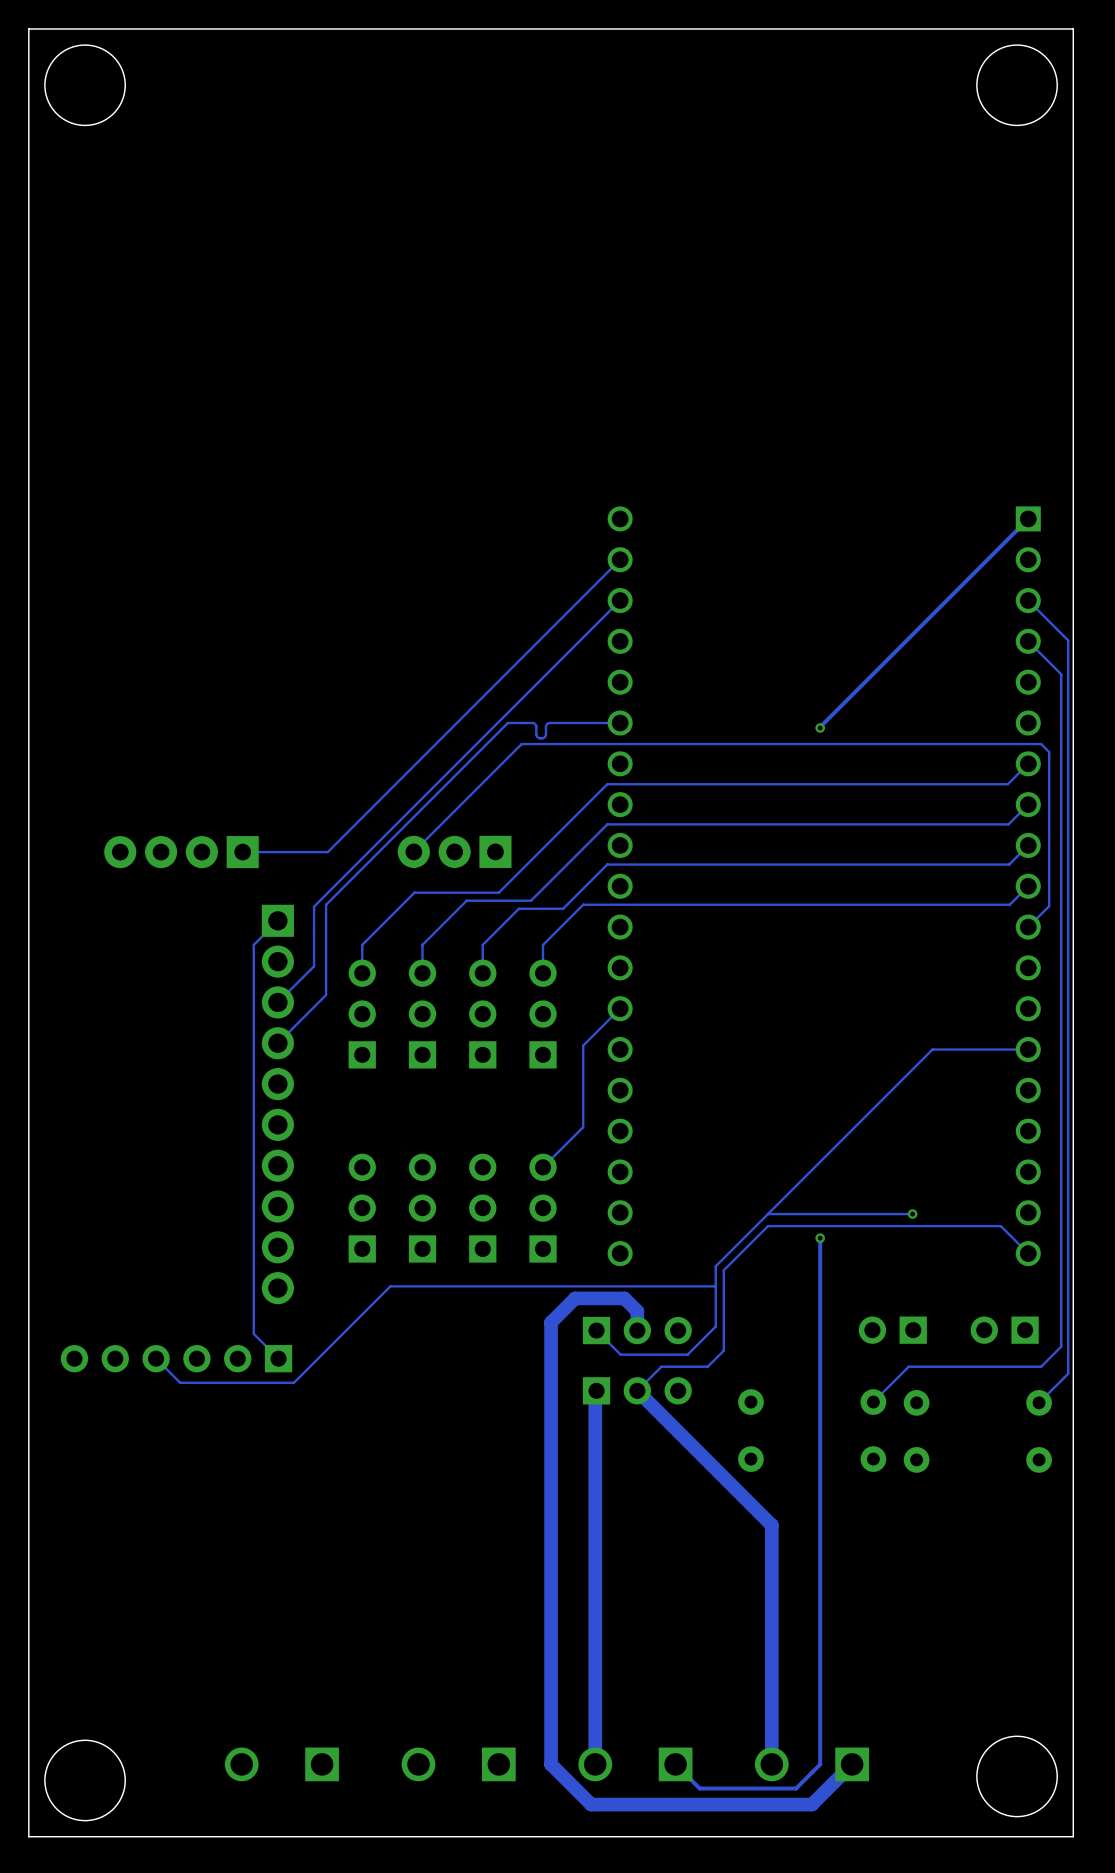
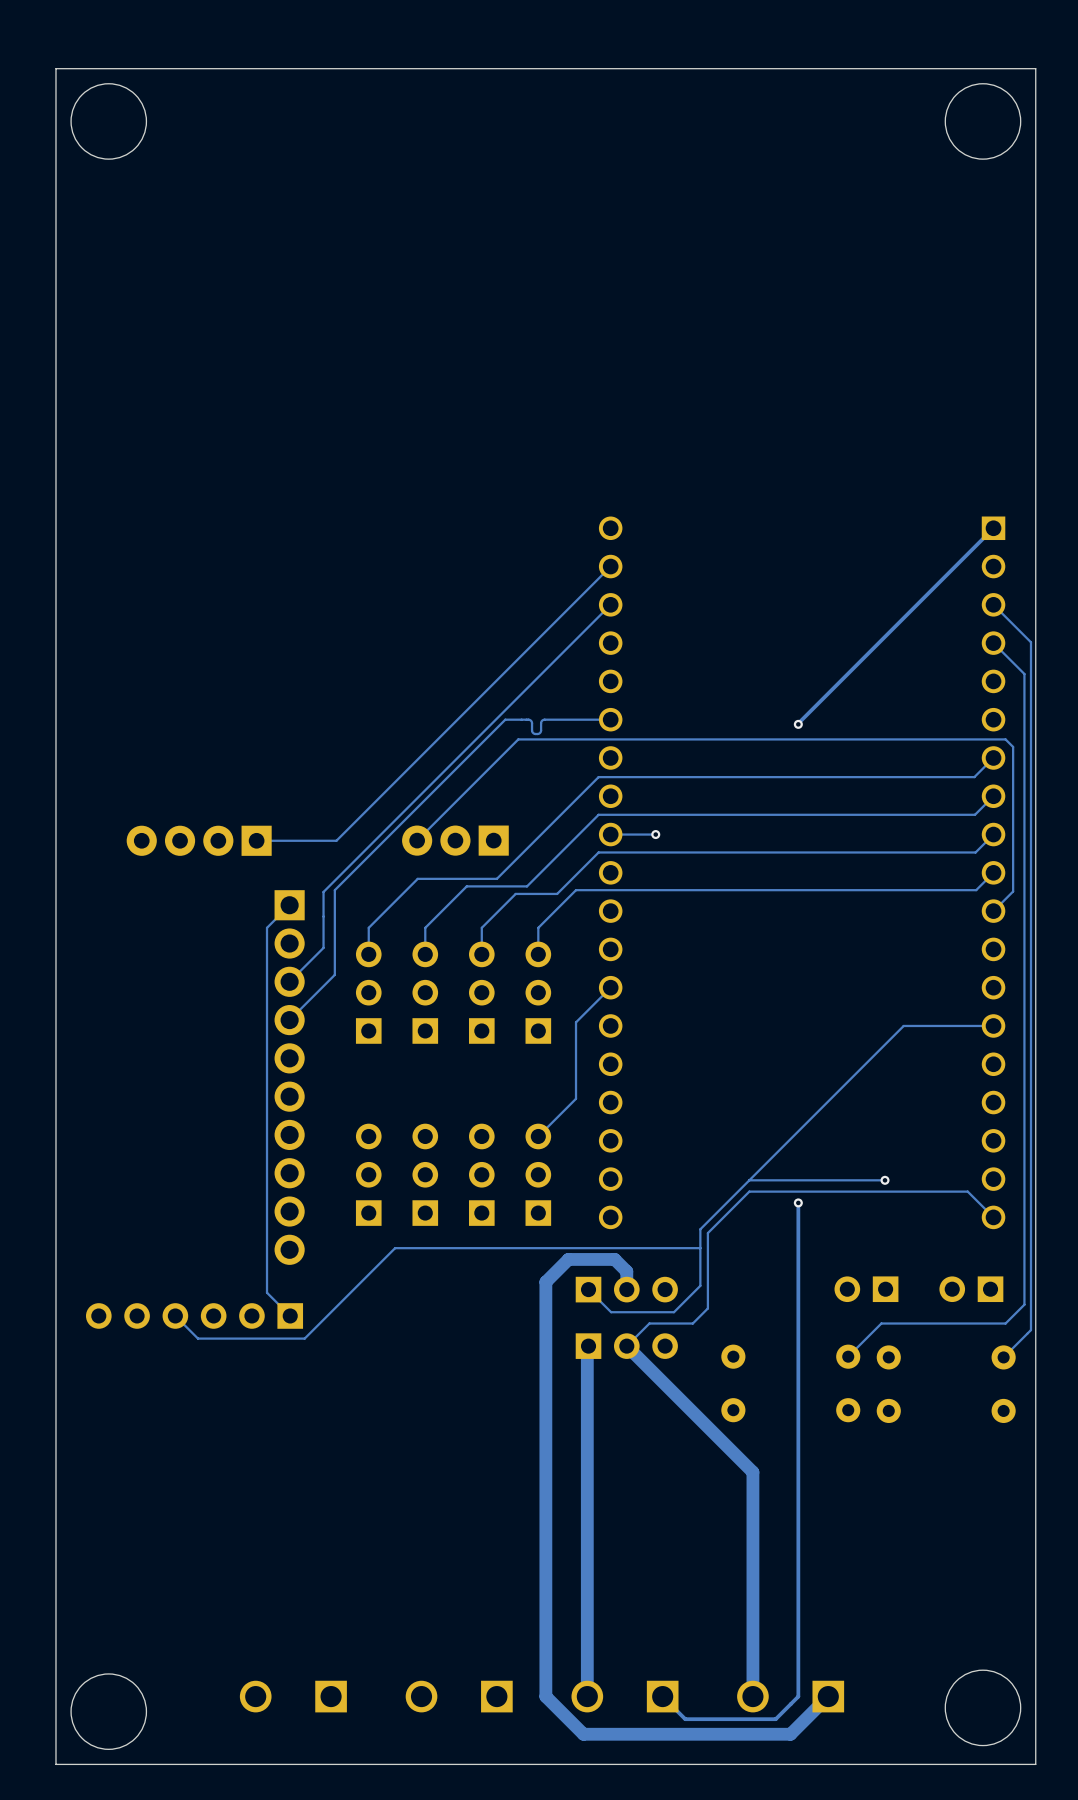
track: none -> (655, 834) (610, 834)
via: none -> (655, 834)

